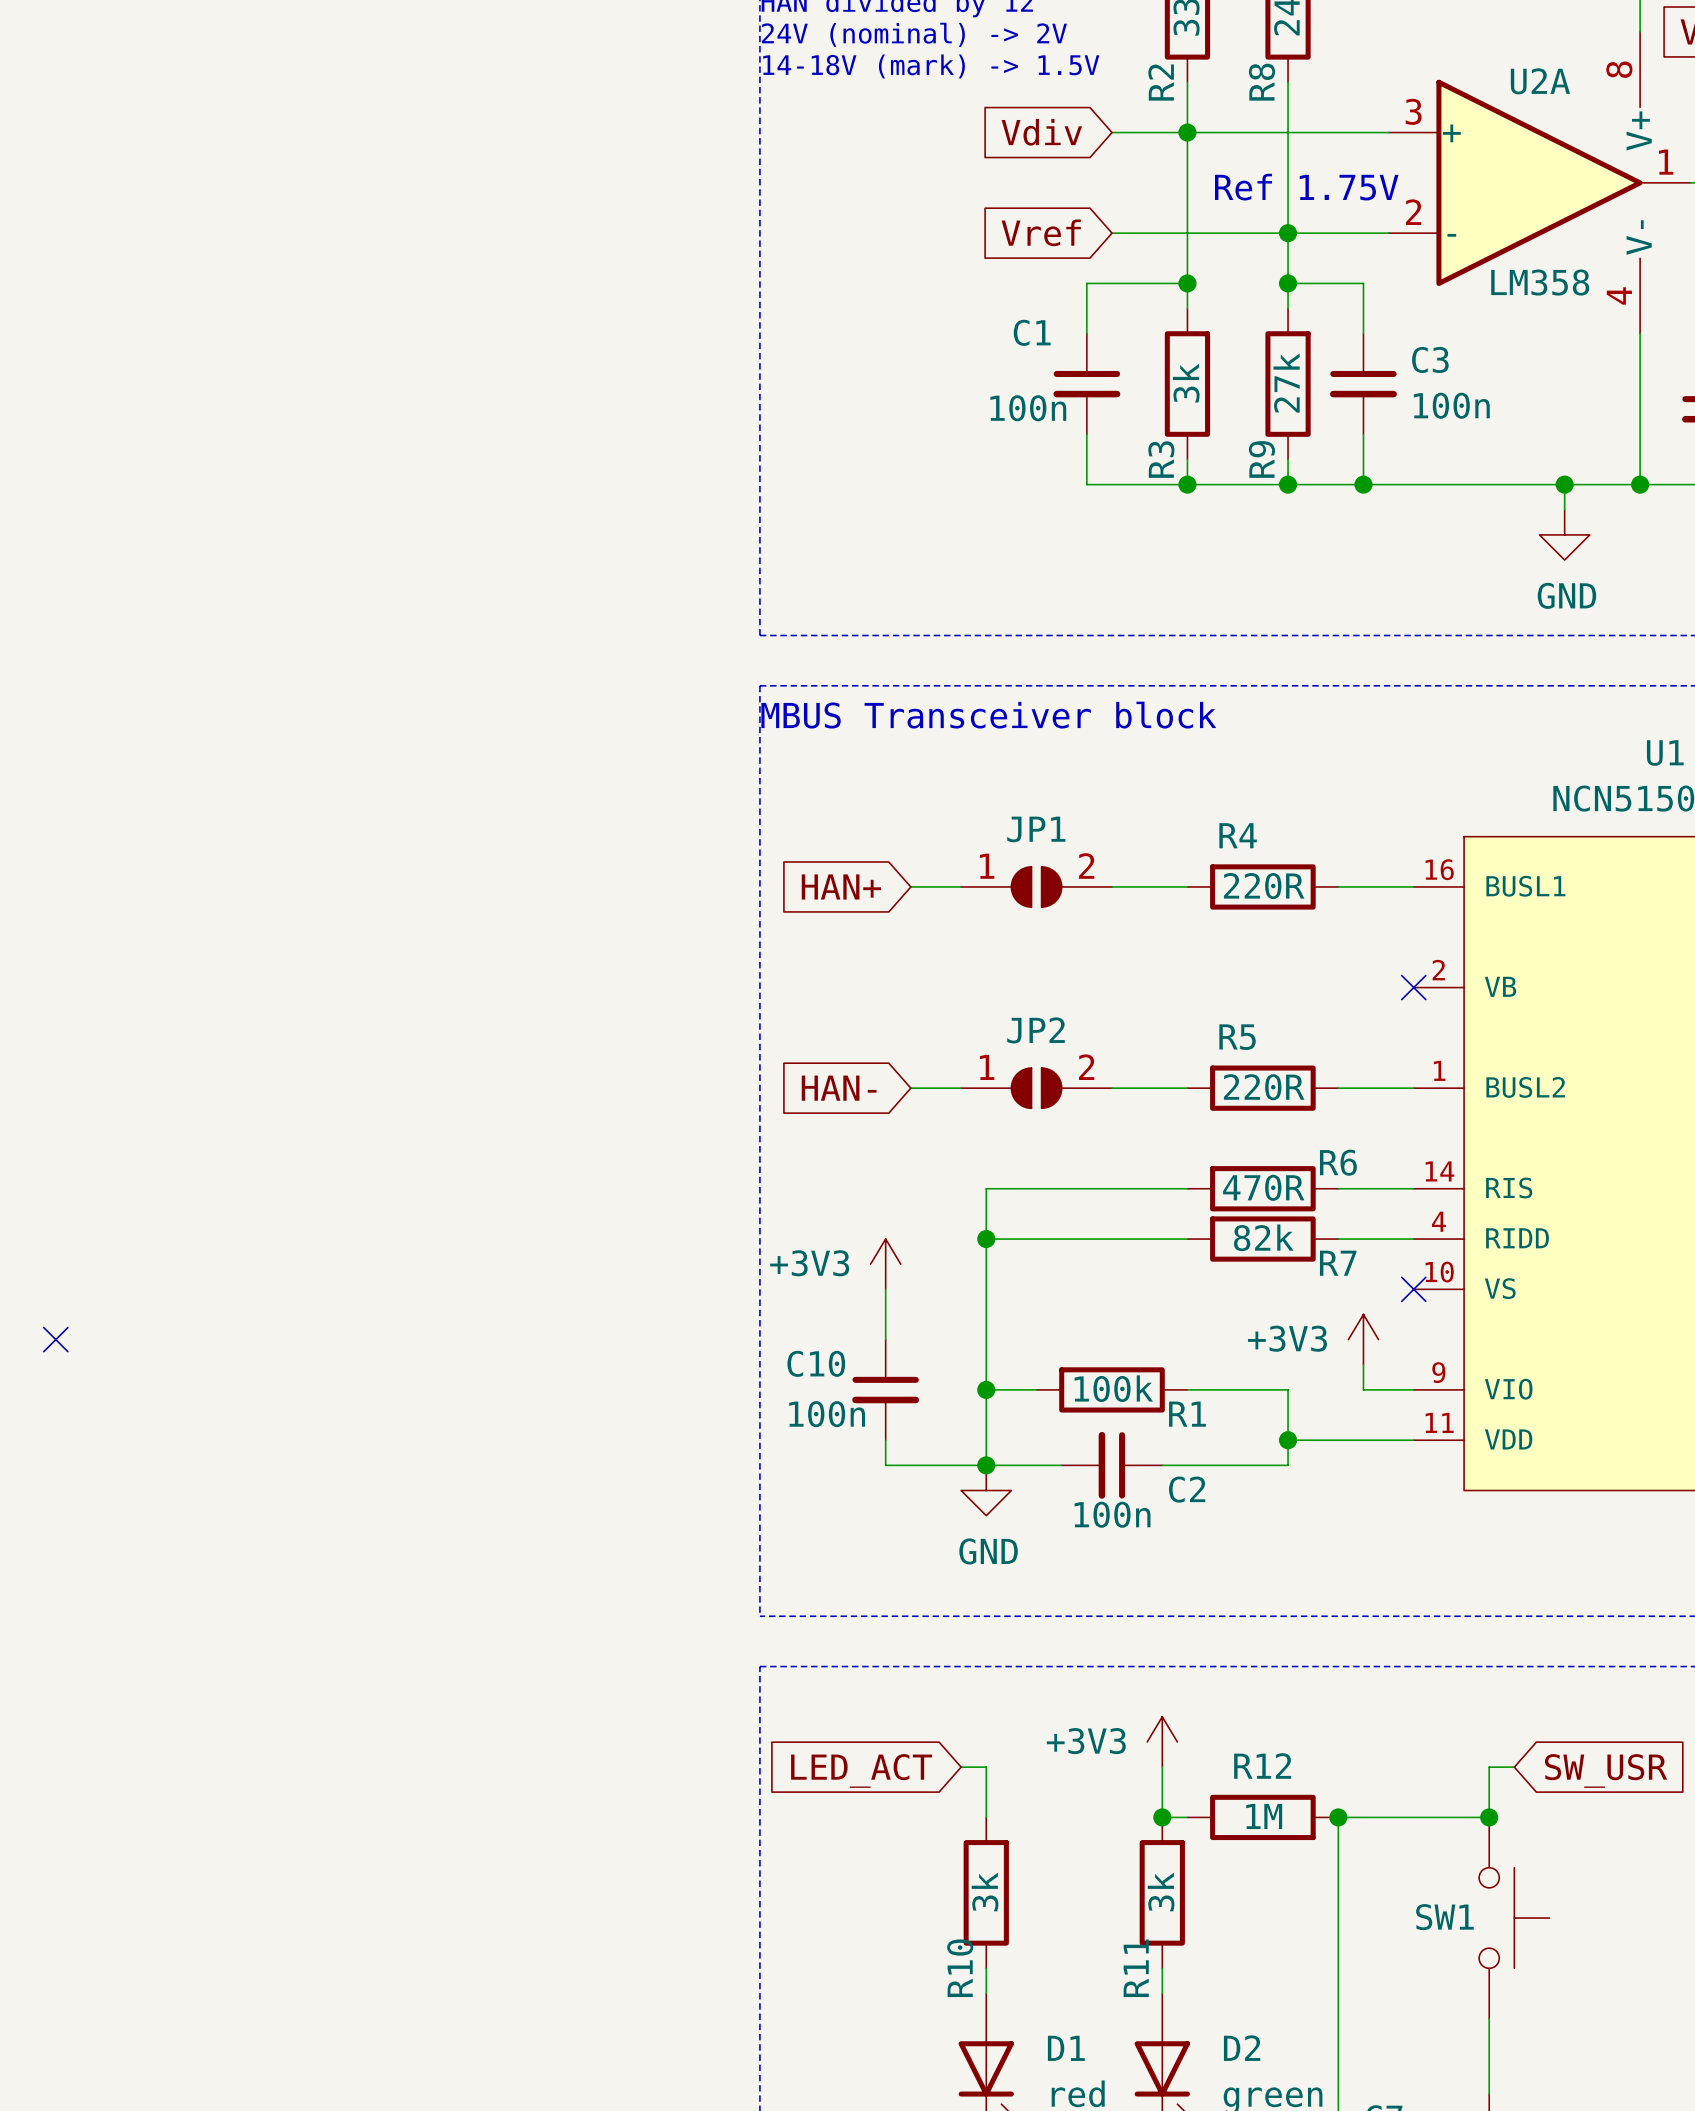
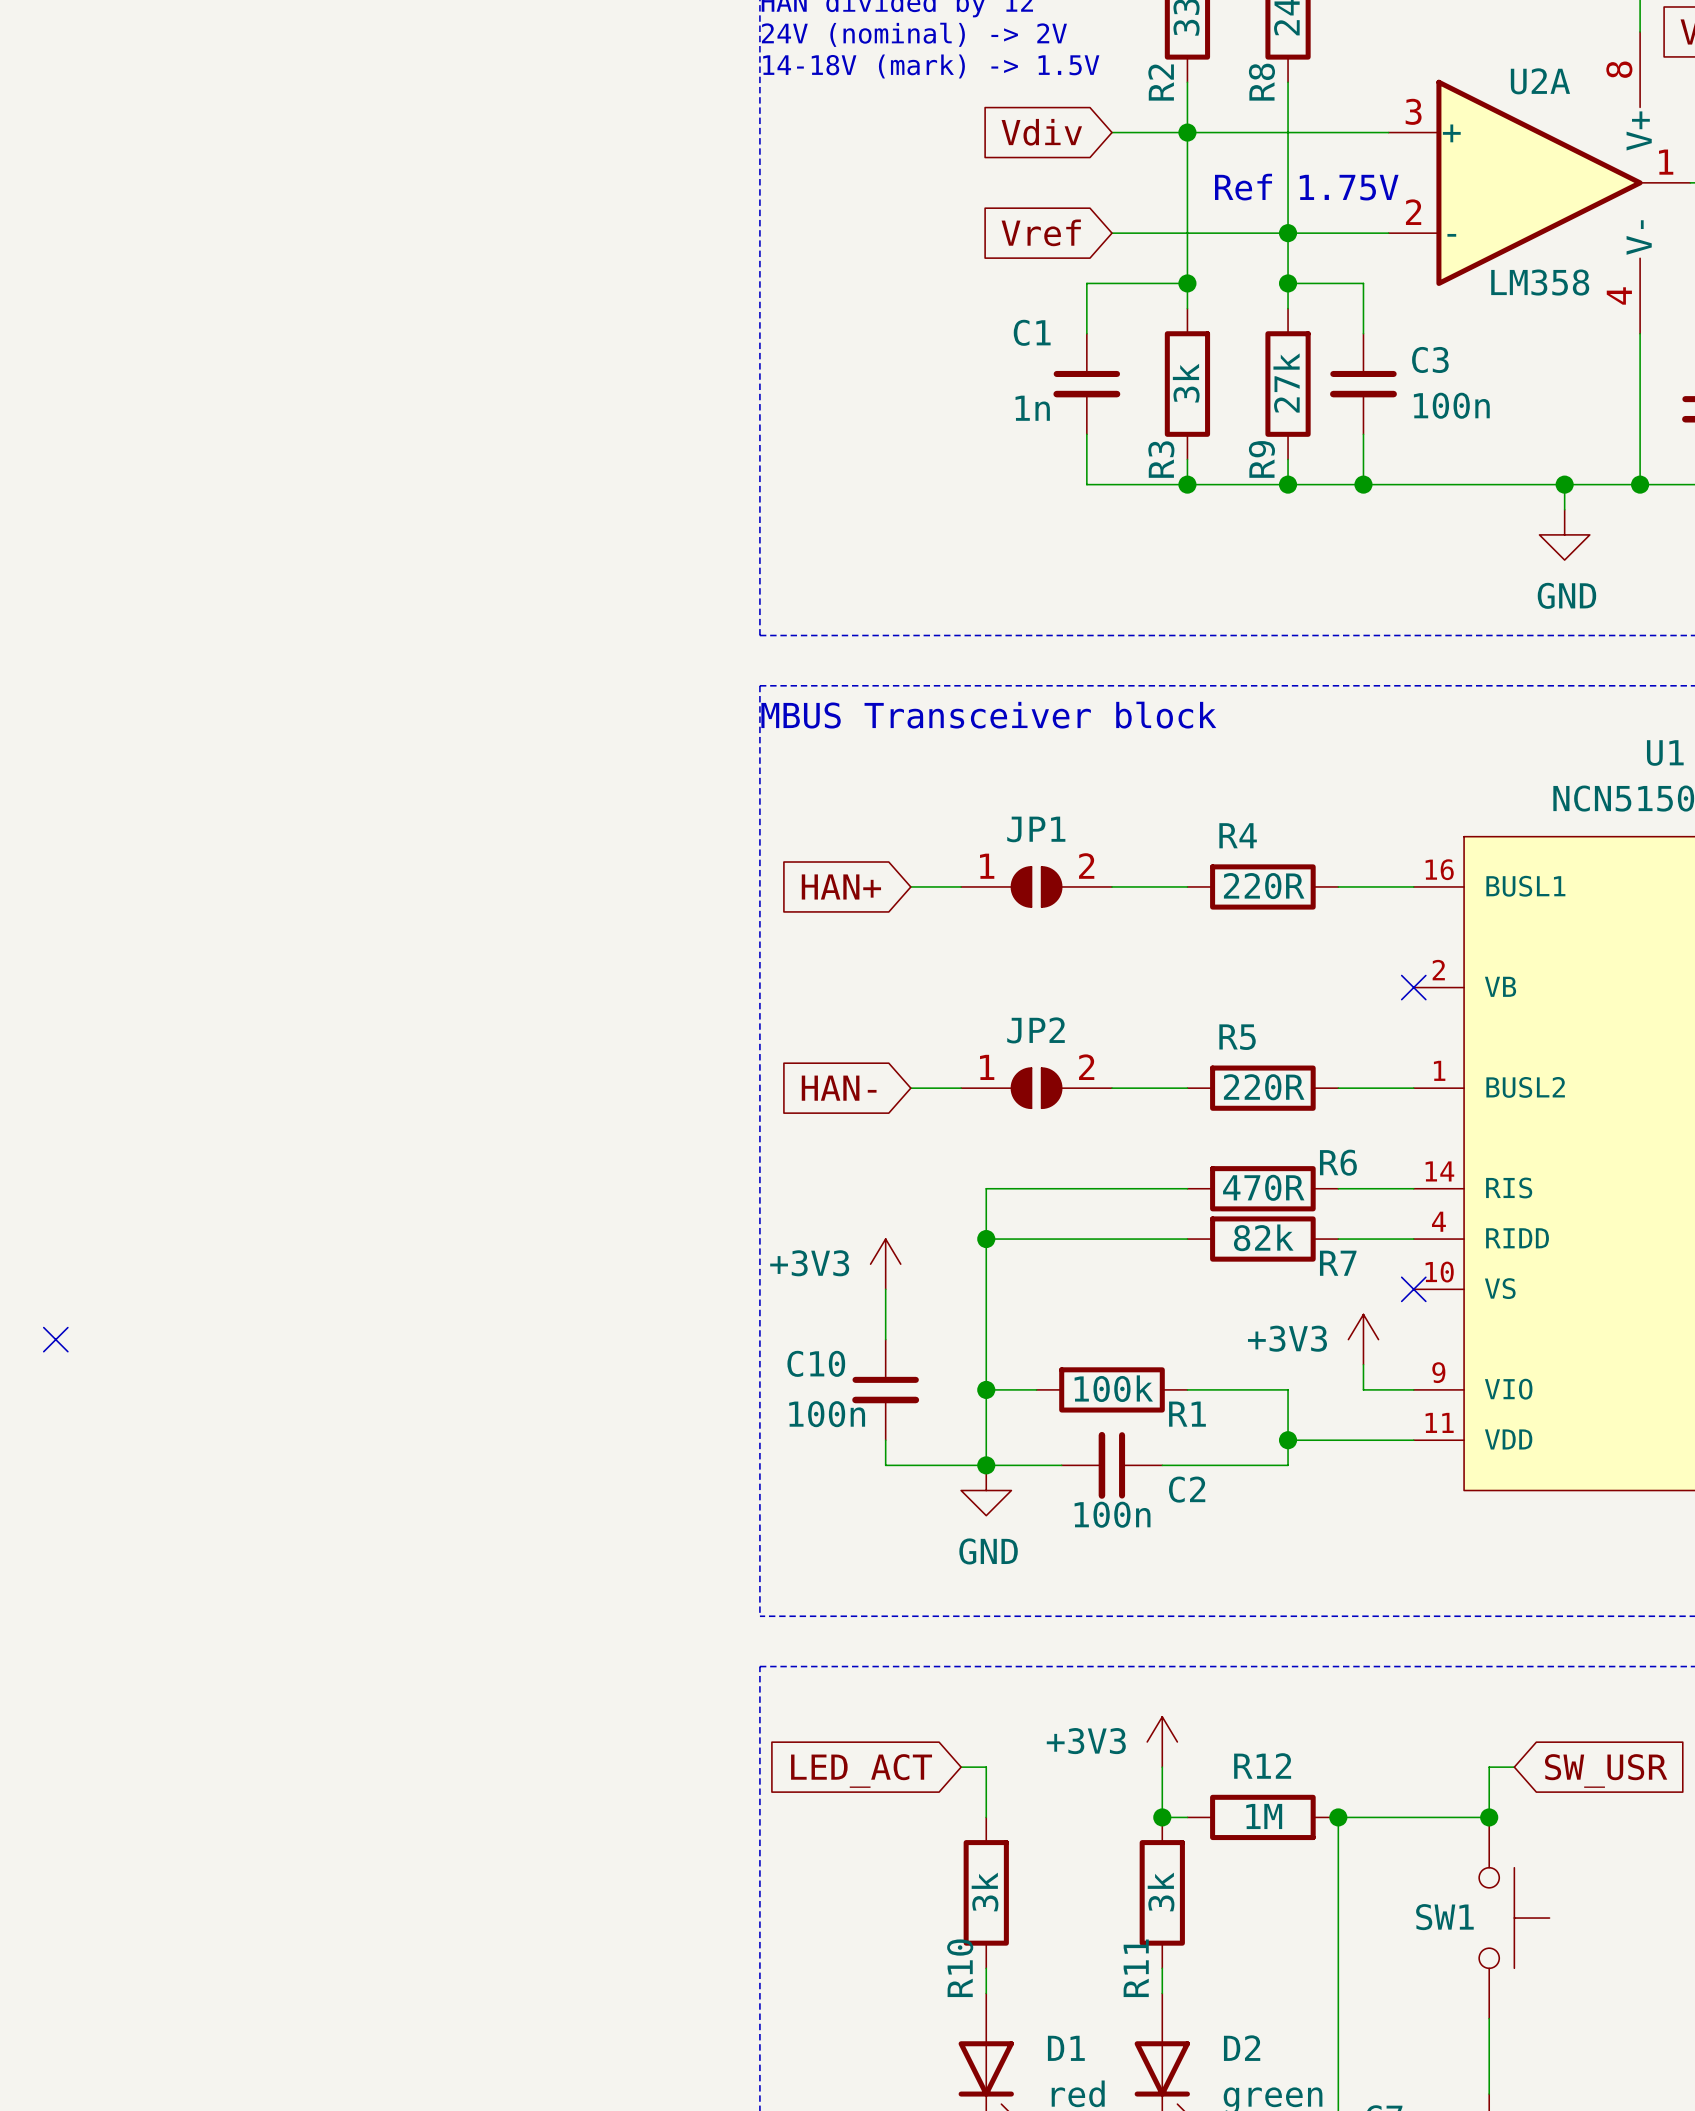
C1 value: 100n (1028, 408) -> 1n (1032, 408)

